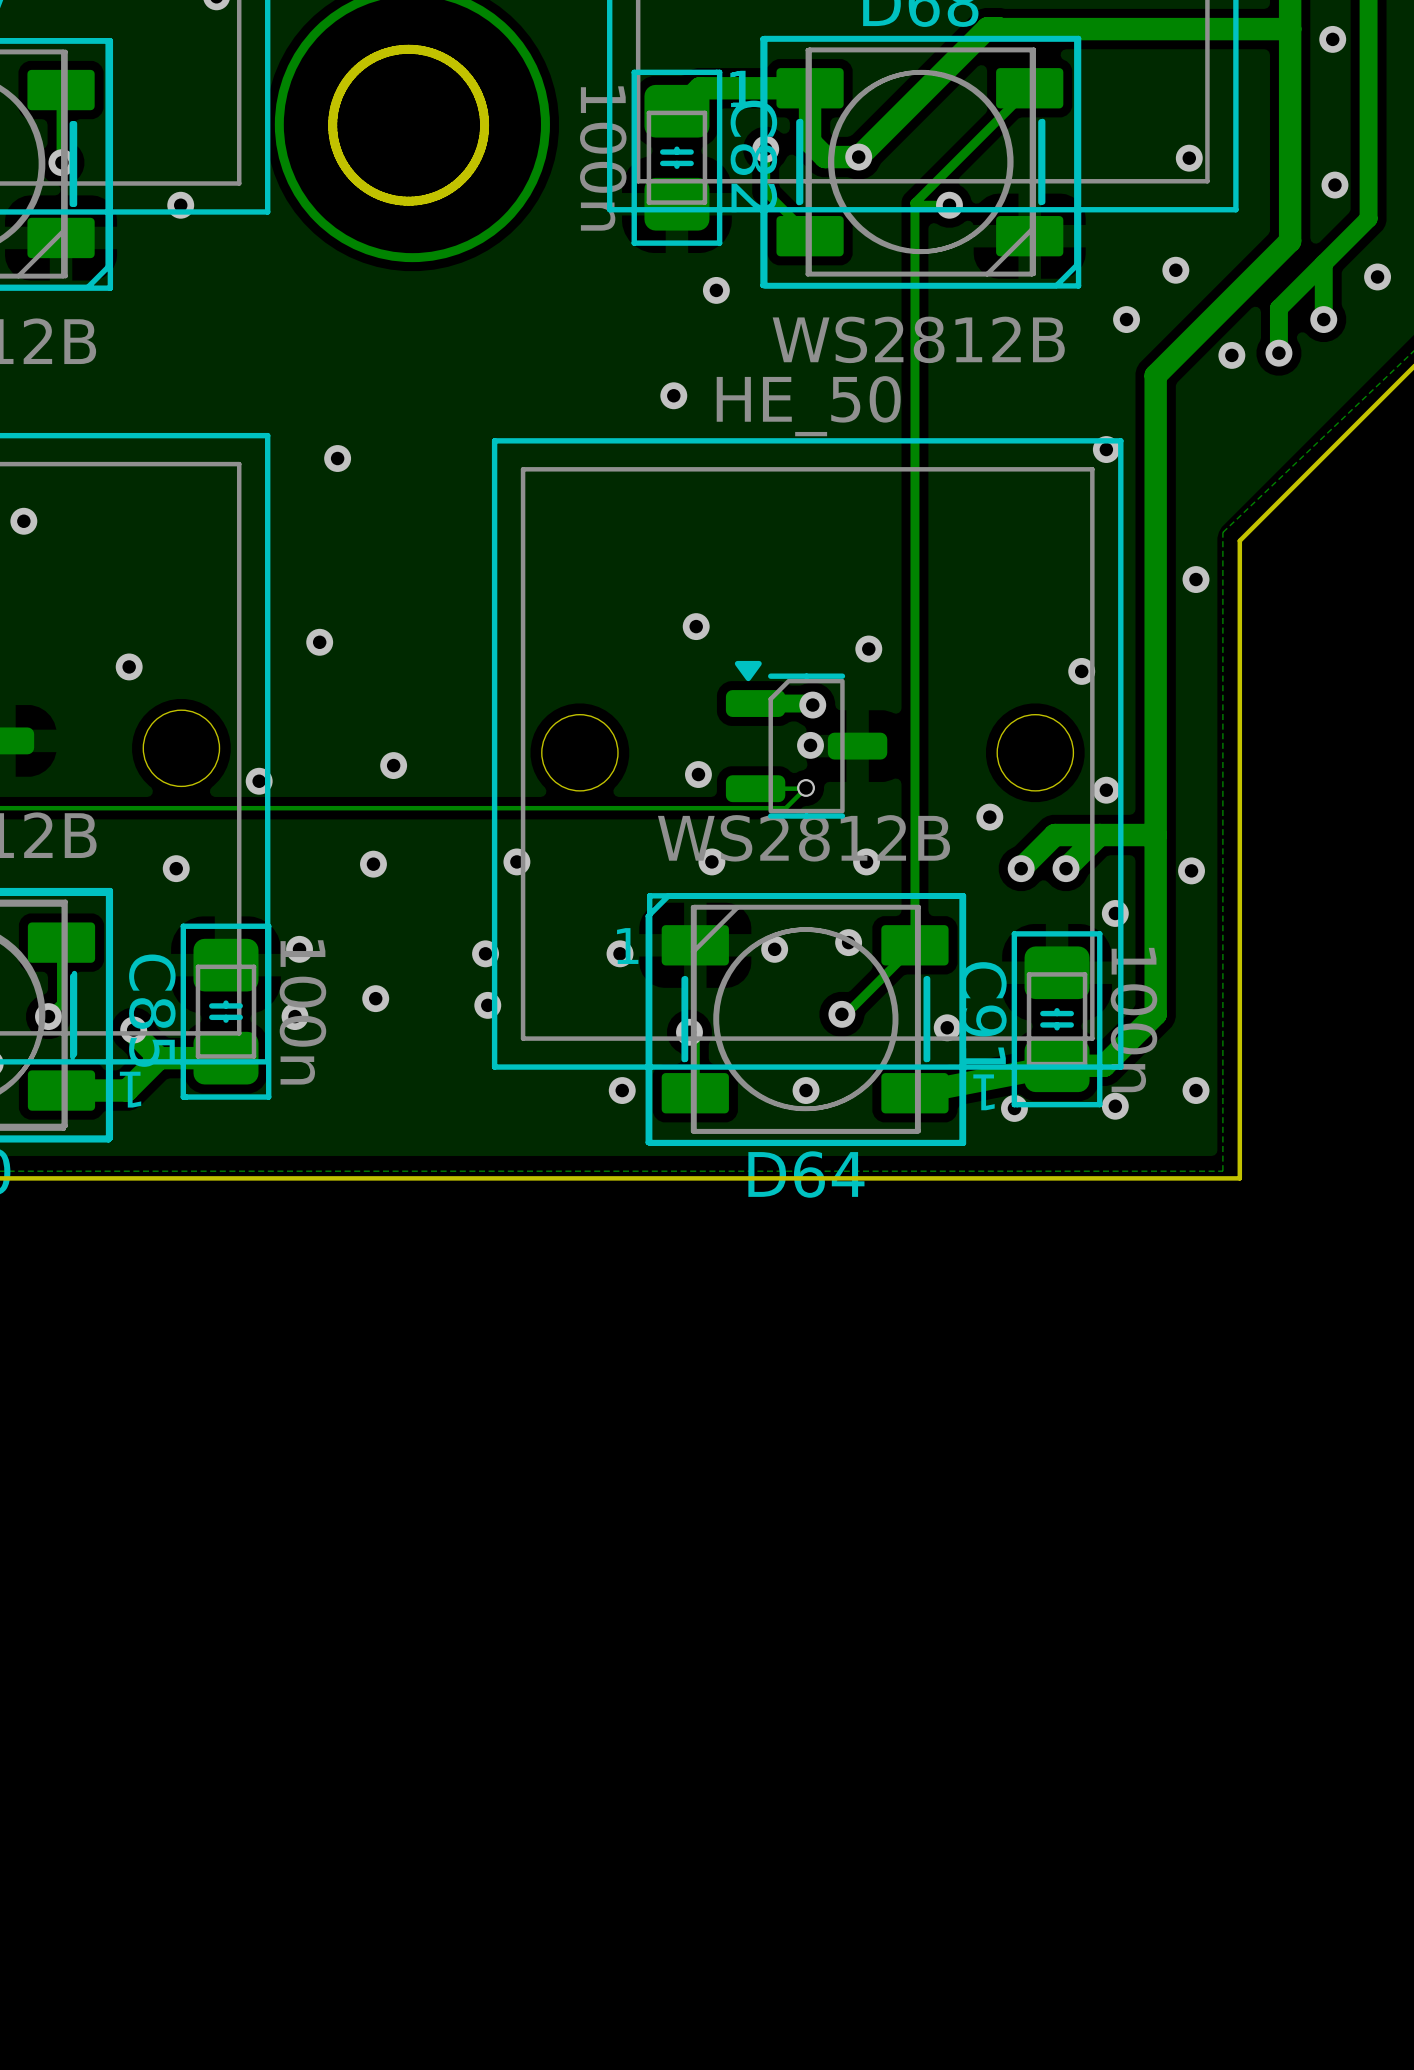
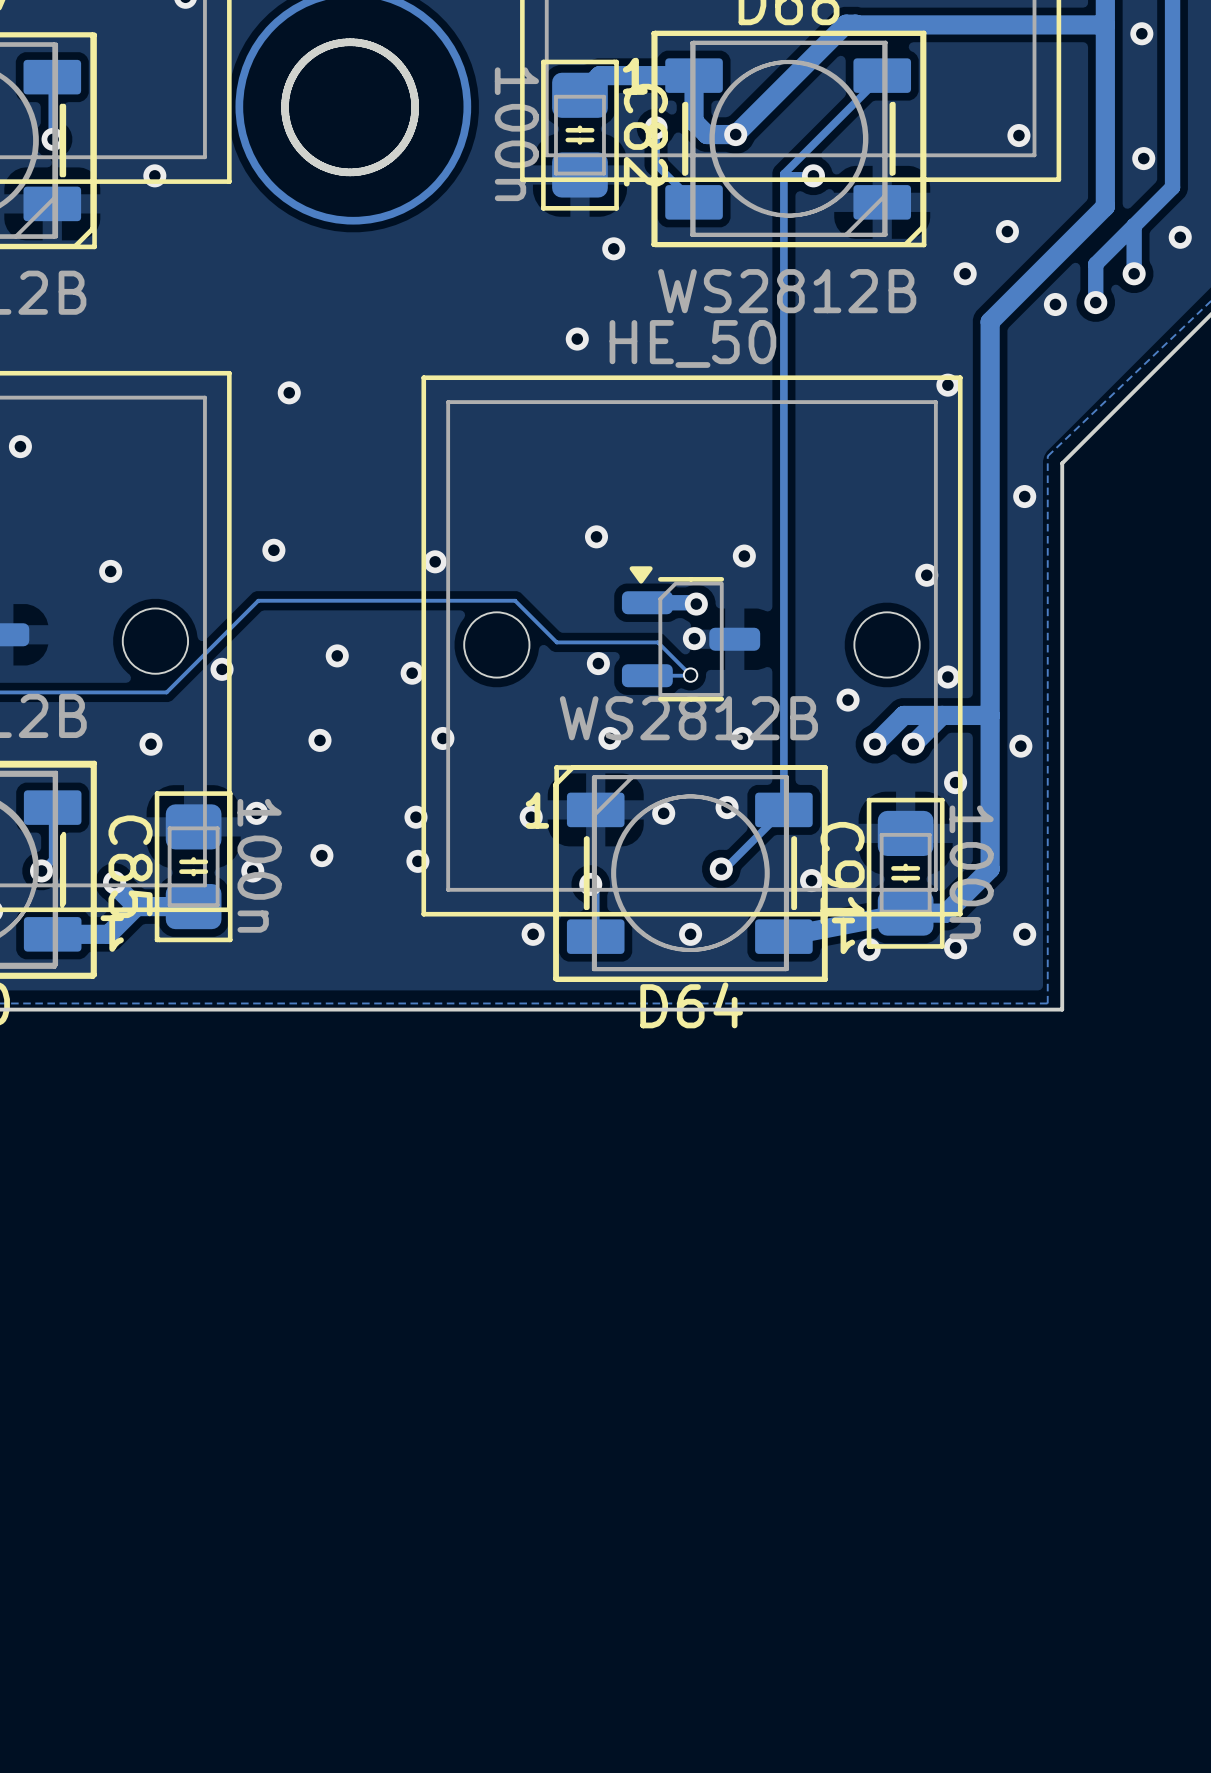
via: none -> (435, 561)
via: none -> (412, 673)
track: (805, 788) (785, 808) (194, 808) -> (690, 675) (657, 642) (556, 642) (515, 600) (258, 600) (166, 692)

